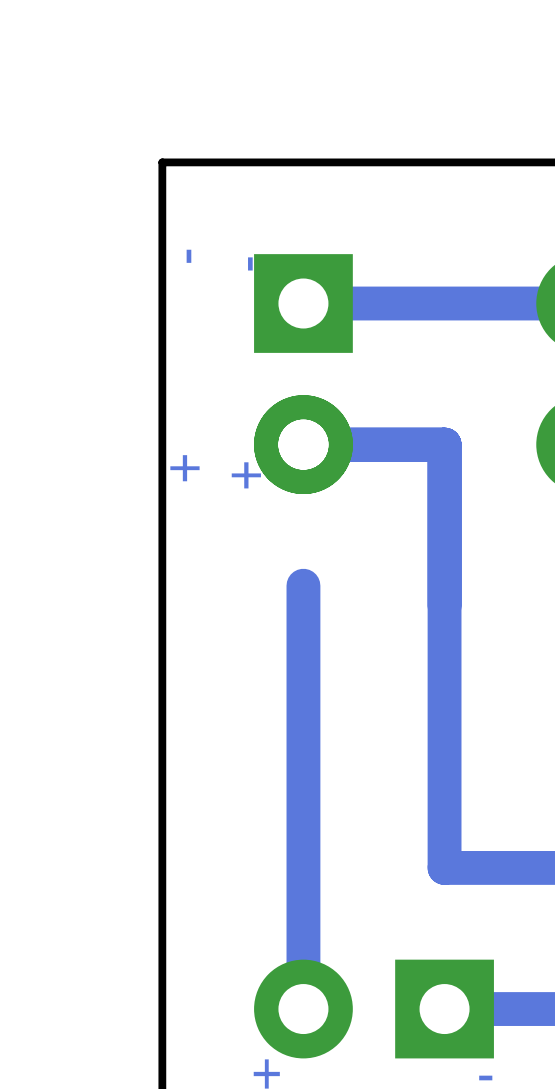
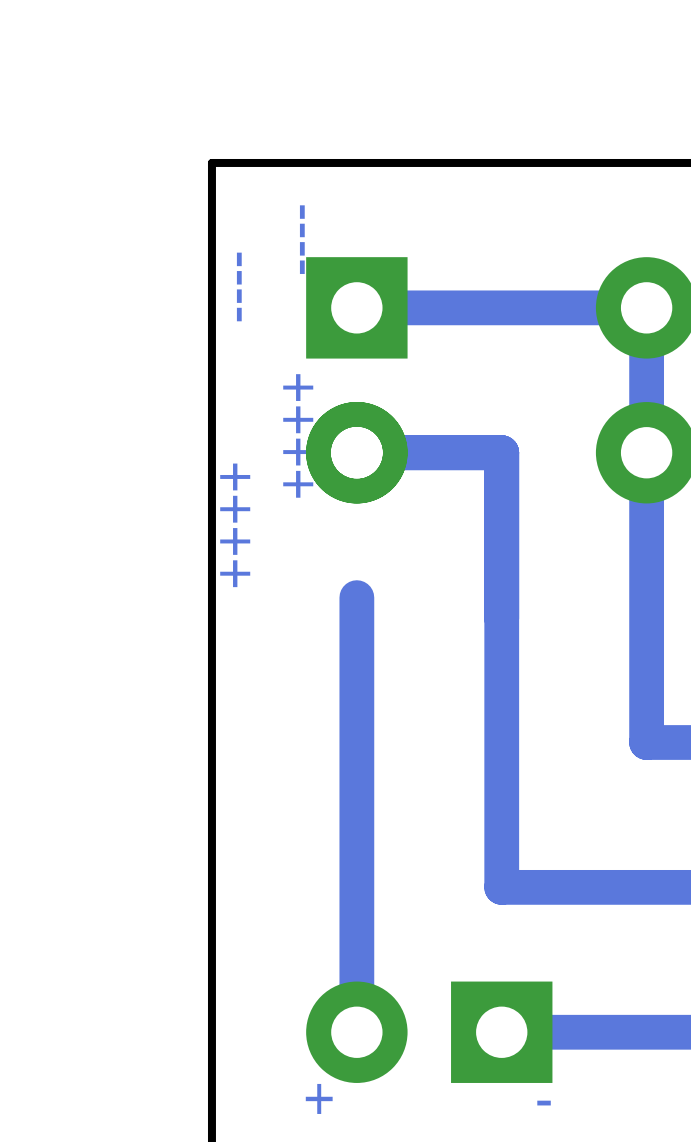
text: - (188, 256) -> ---- (239, 286)
part text: - (250, 263) -> ---- (302, 239)
text: + (184, 468) -> ++++ (235, 525)
part text: + (246, 475) -> ++++ (298, 435)

